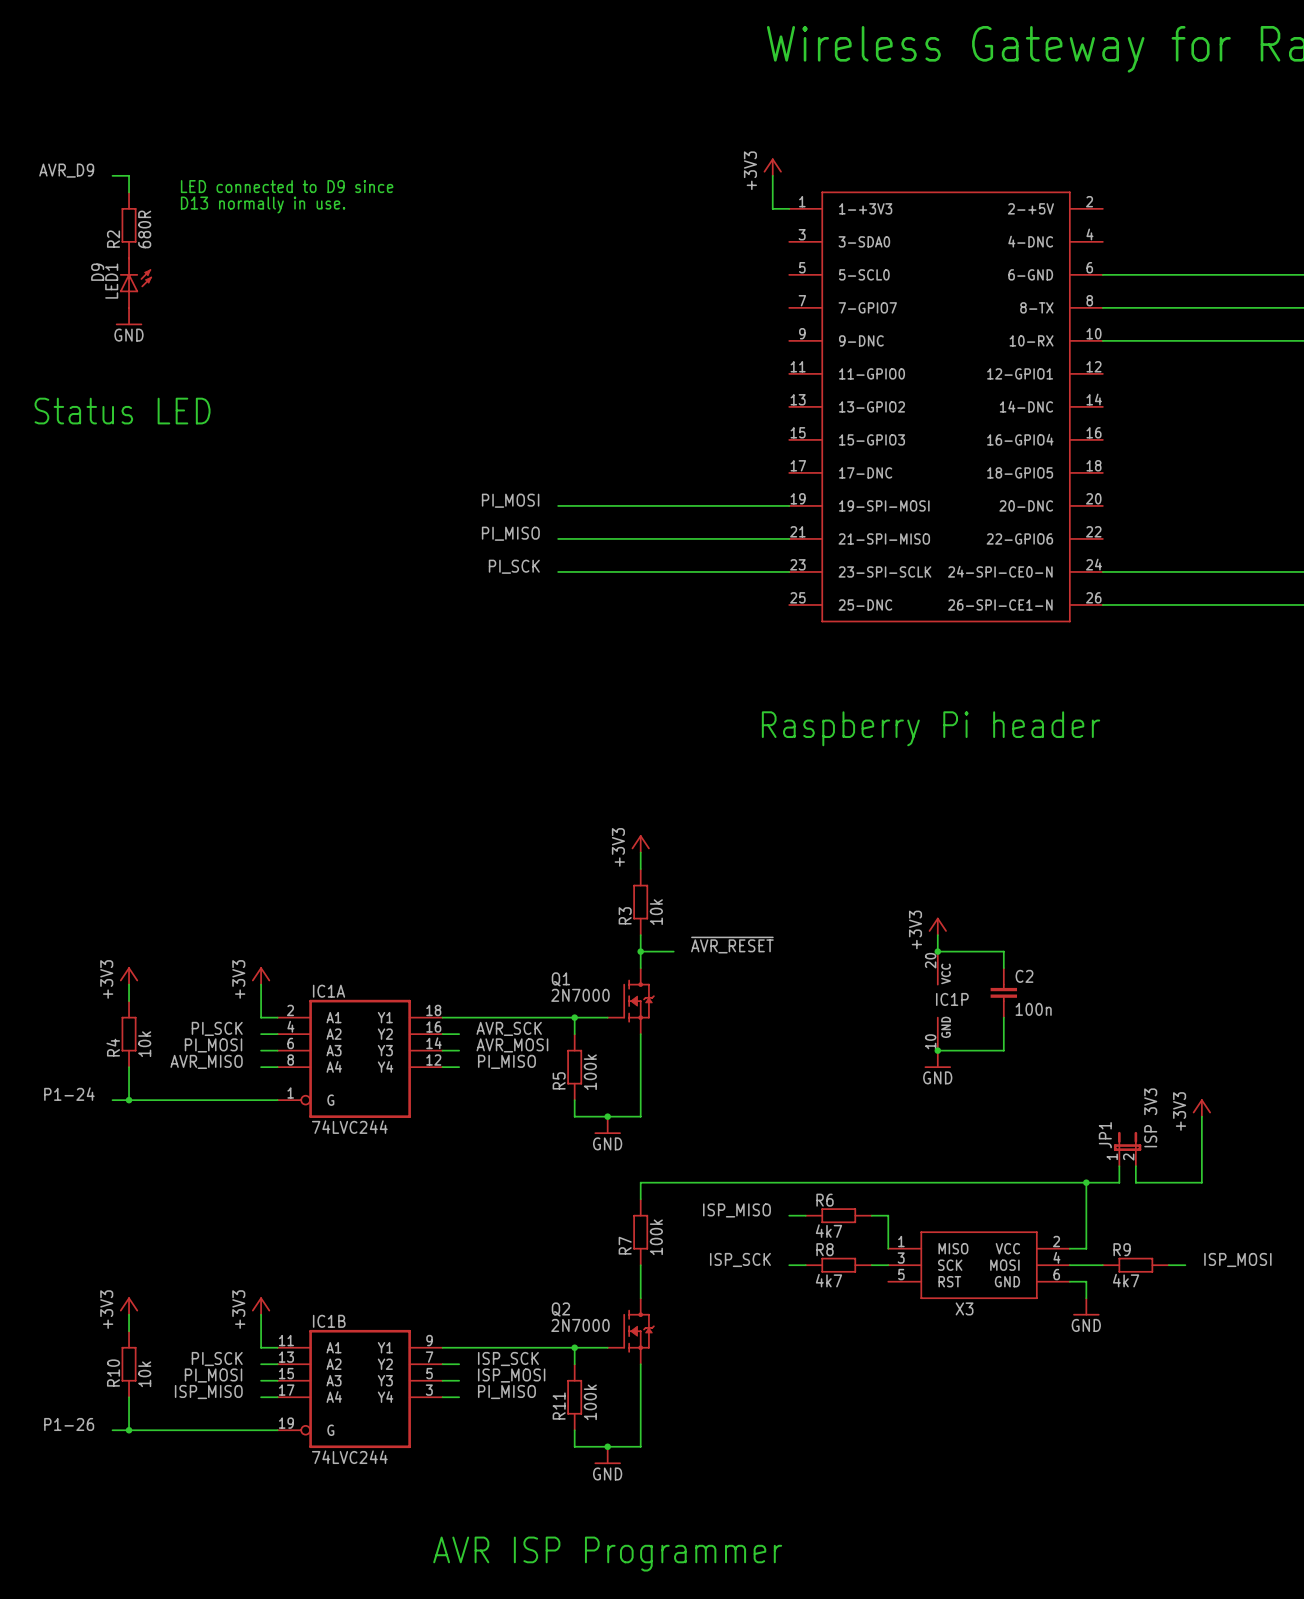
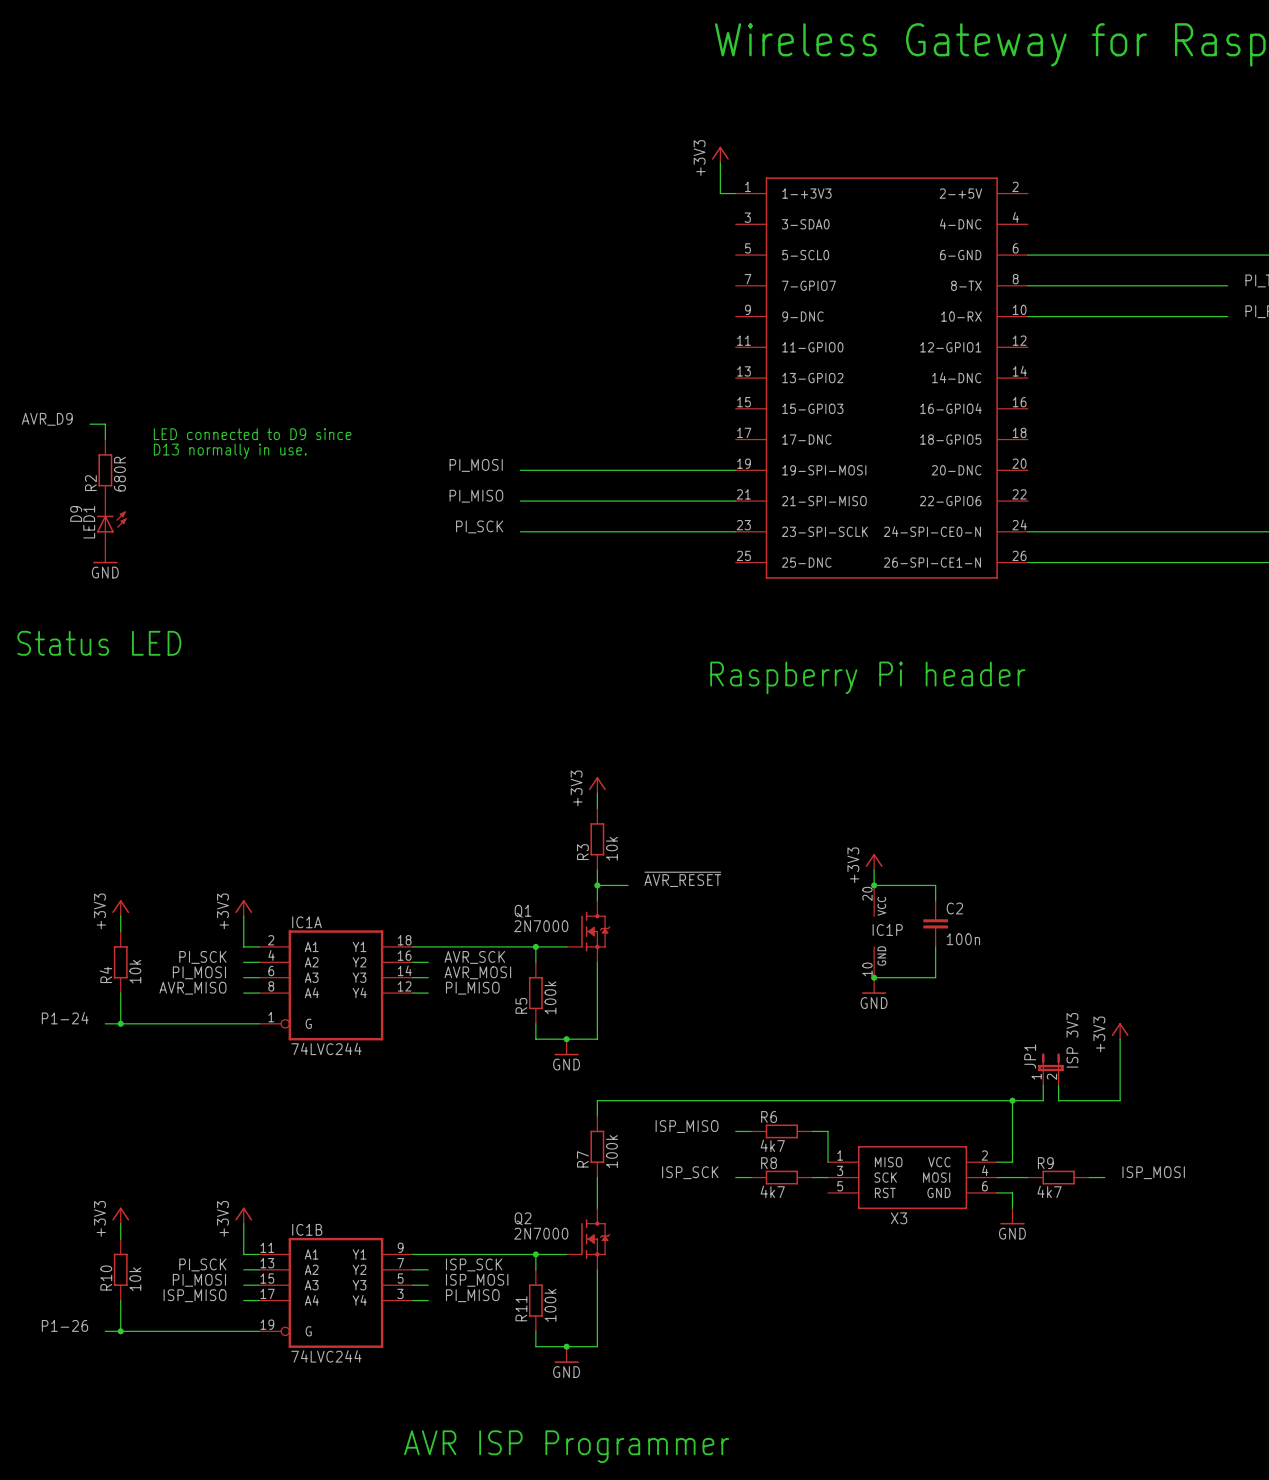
label: AVR_D9 (66, 170) -> none
wire: (112, 175) (129, 175) (129, 192) -> none
text: LED connected to D9 since (287, 186) -> none
text: D13 normally in use. (263, 205) -> none
R2 position: (129, 225) -> (105, 470)
LED1 position: (135, 283) -> (111, 524)
power symbol: GND (129, 316) -> none
text: Status LED (122, 411) -> none
label: none -> AVR_D9 (47, 419)
wire: none -> (89, 424) (105, 424) (105, 439)
text: none -> LED connected to D9 since (252, 434)
text: none -> D13 normally in use. (230, 451)
power symbol: none -> GND (105, 555)
text: none -> Status LED (99, 643)

